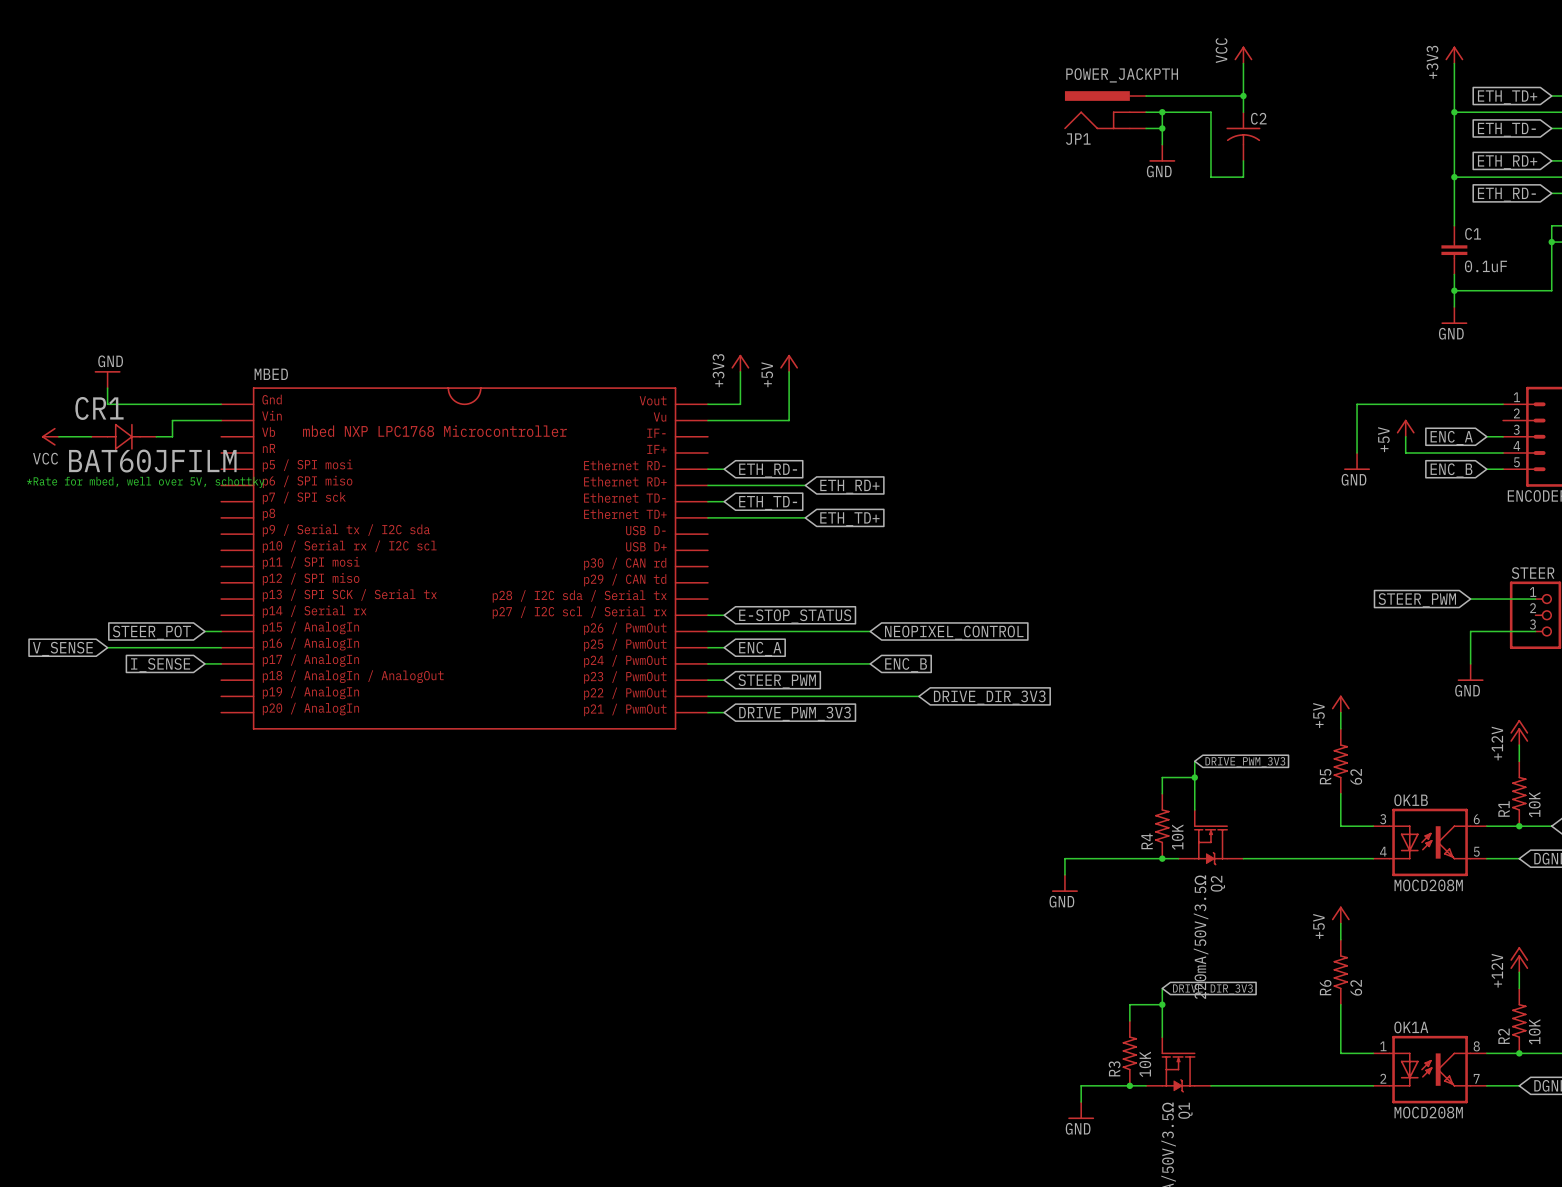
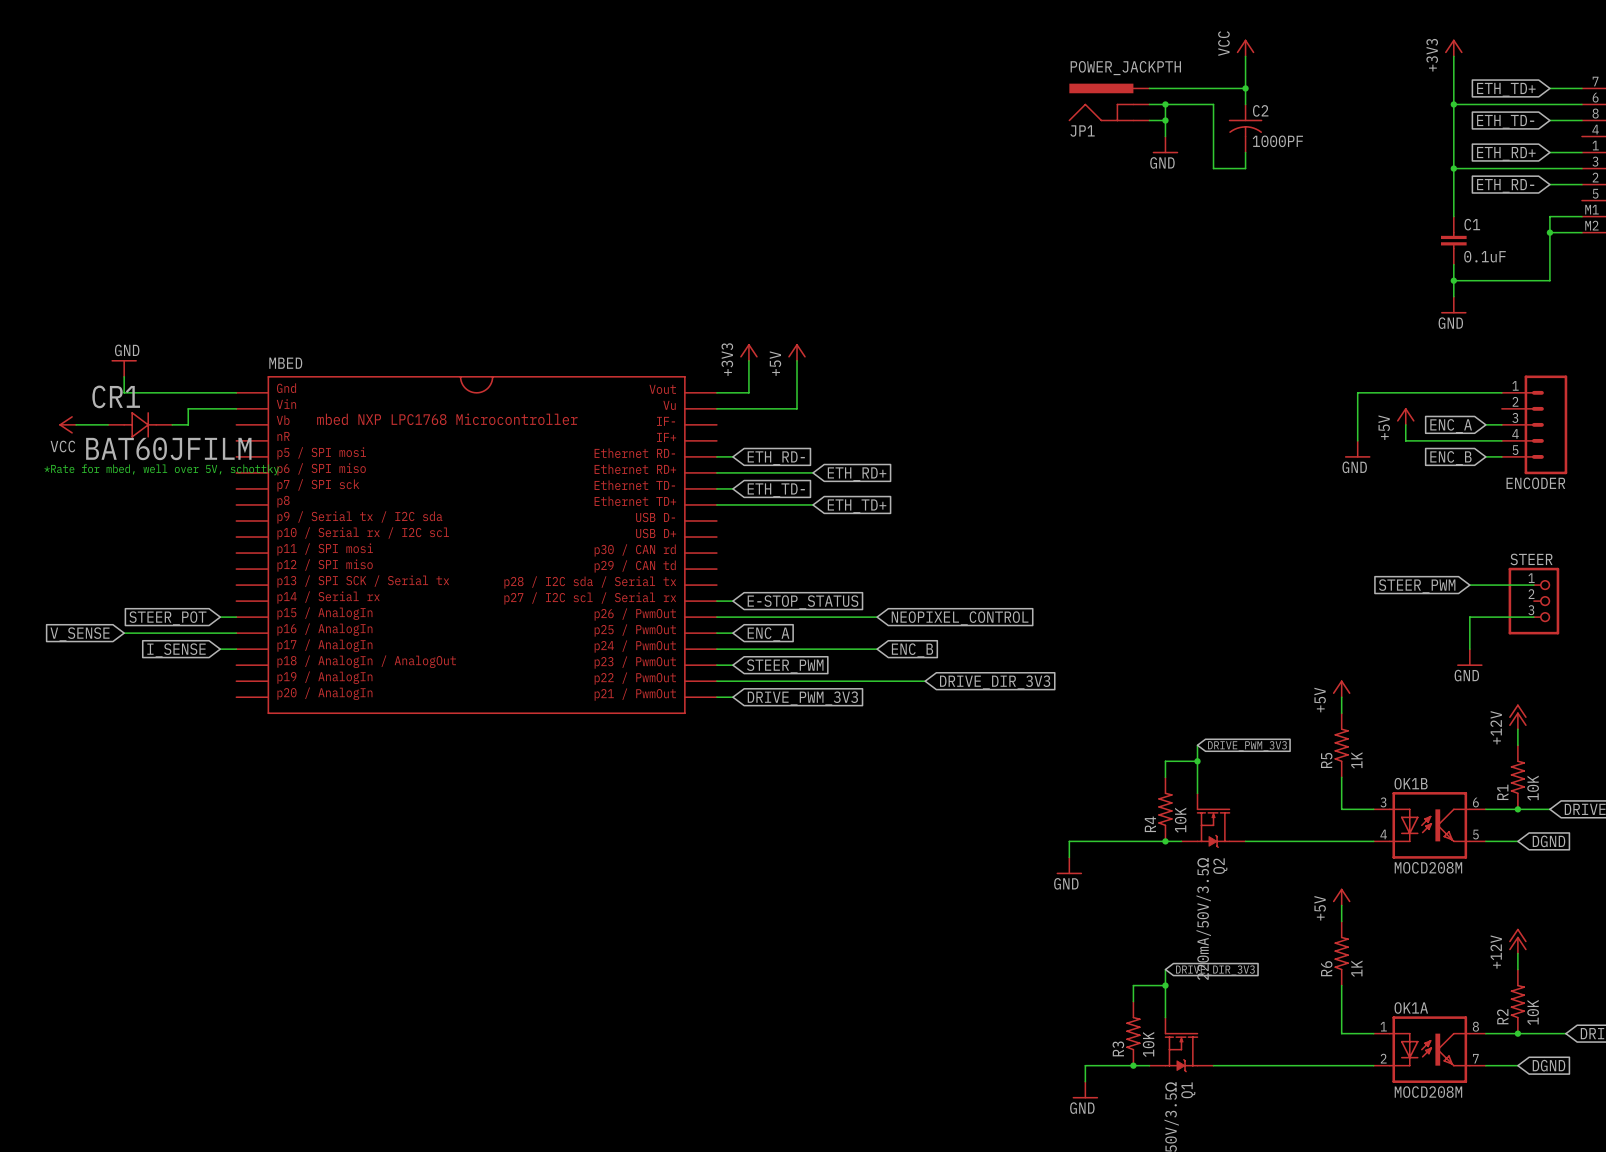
C2 value: none -> 1000PF (1277, 141)
R5 value: 62 (1356, 776) -> 1K (1356, 760)
R6 value: 62 (1356, 987) -> 1K (1356, 968)

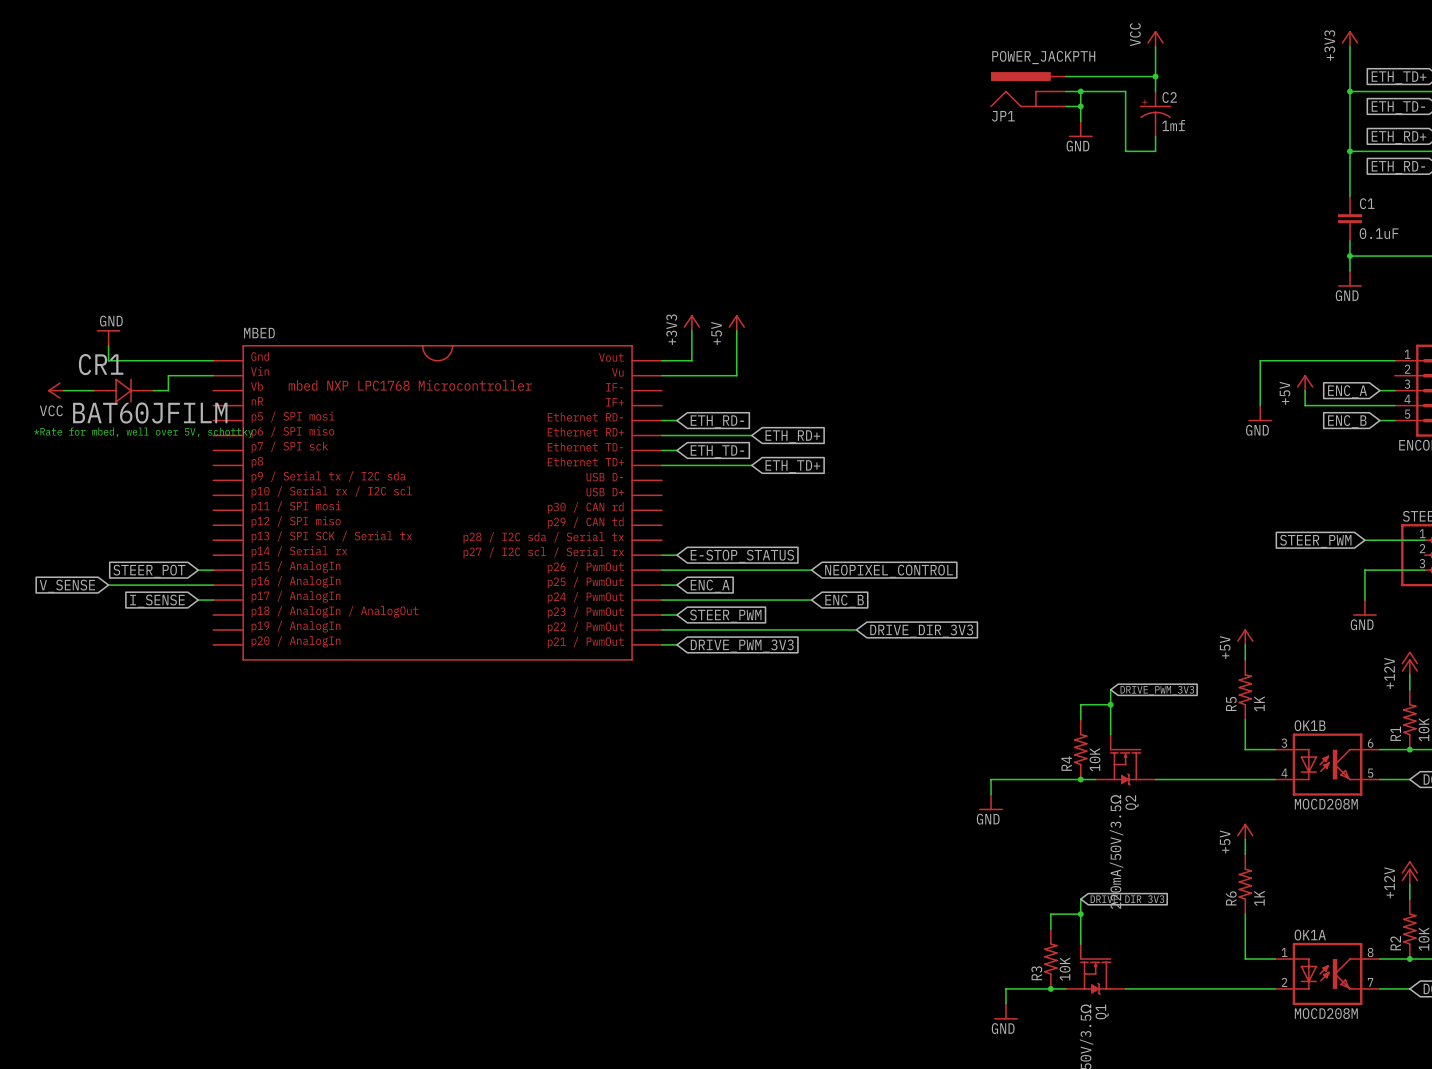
C2 symbol: [1228, 104, 1263, 153] -> [1139, 91, 1172, 137]
C2 value: 1000PF (1277, 141) -> 1mf (1173, 125)

